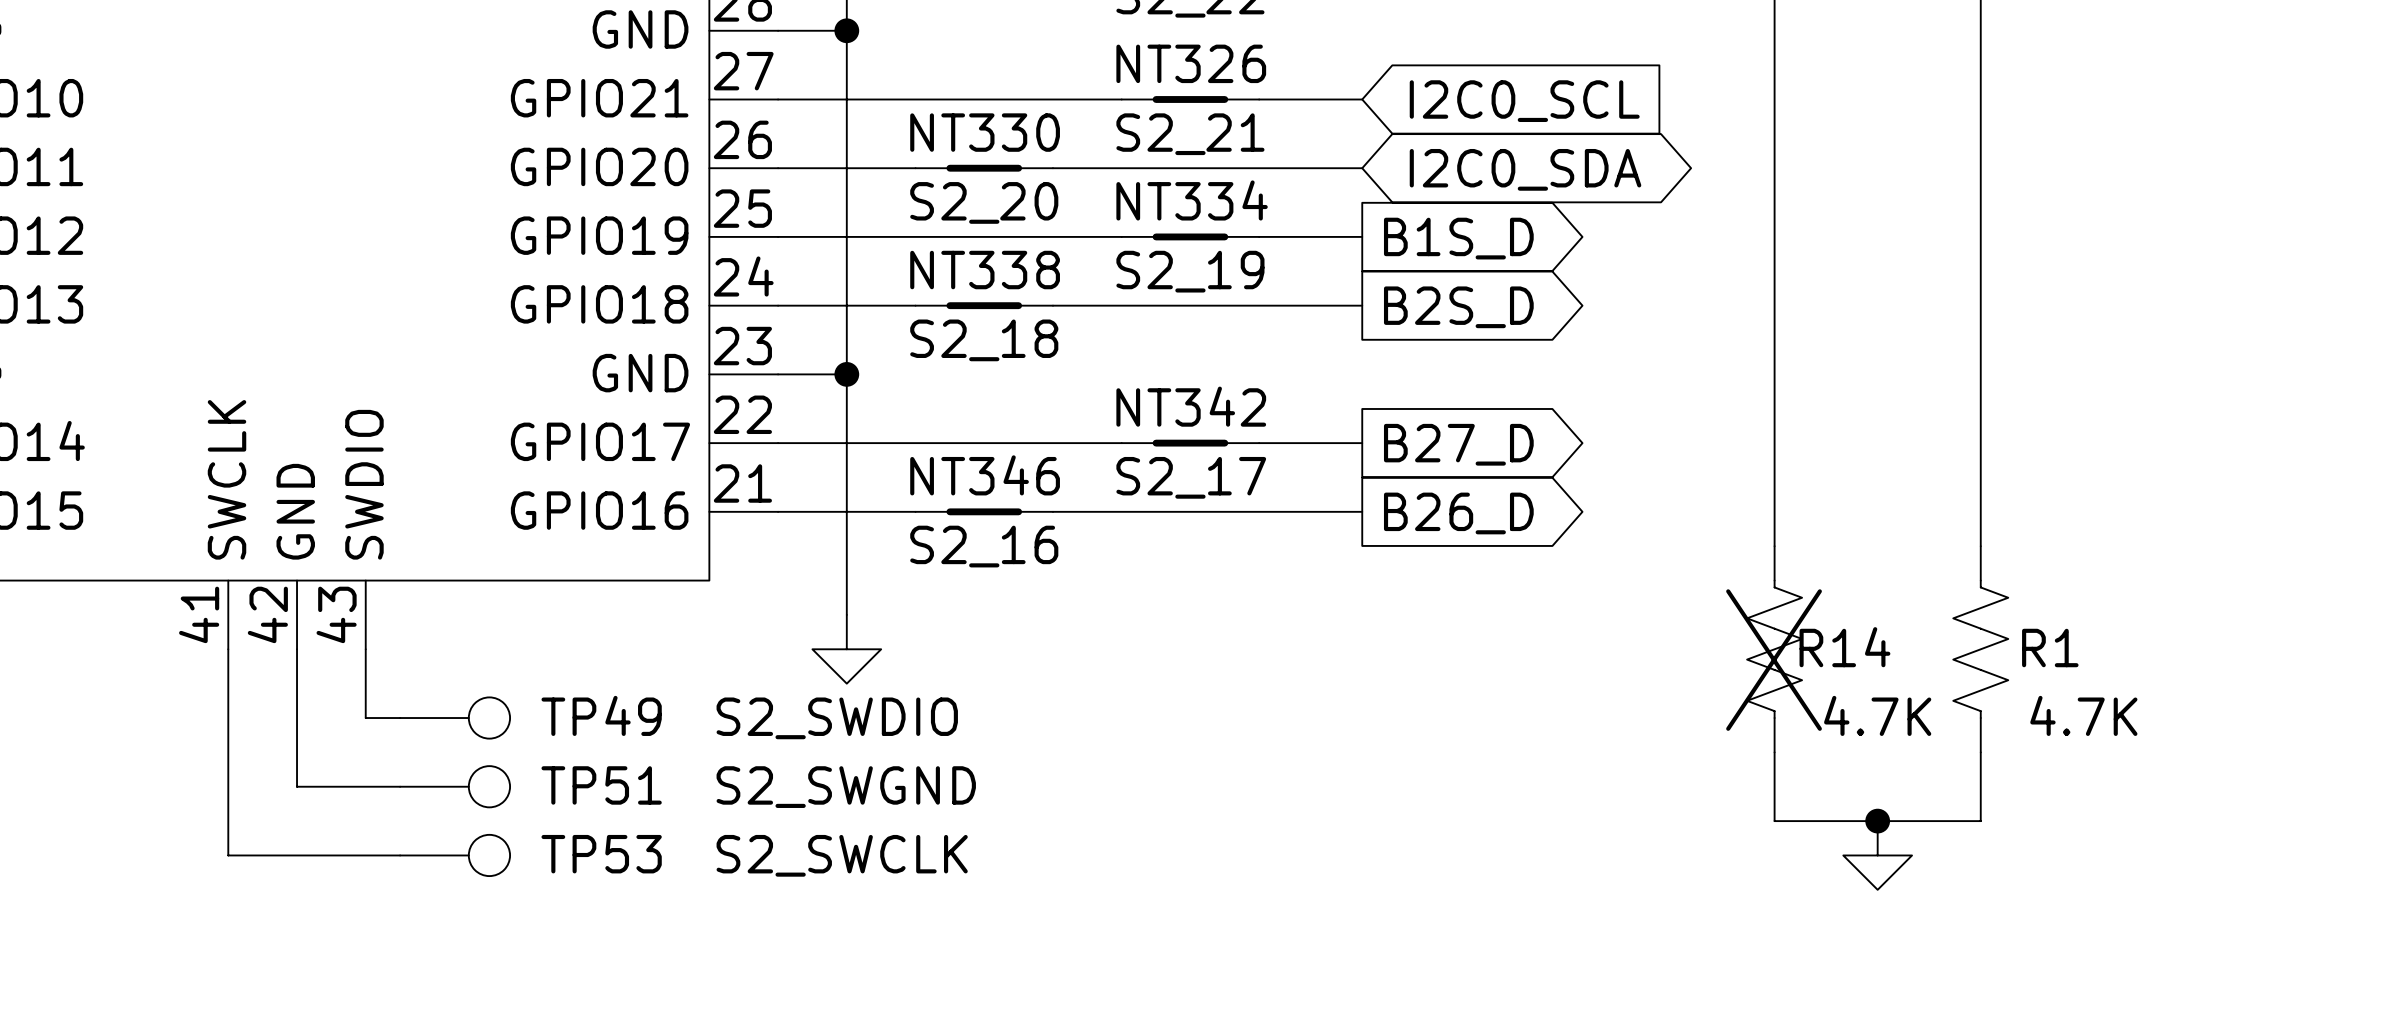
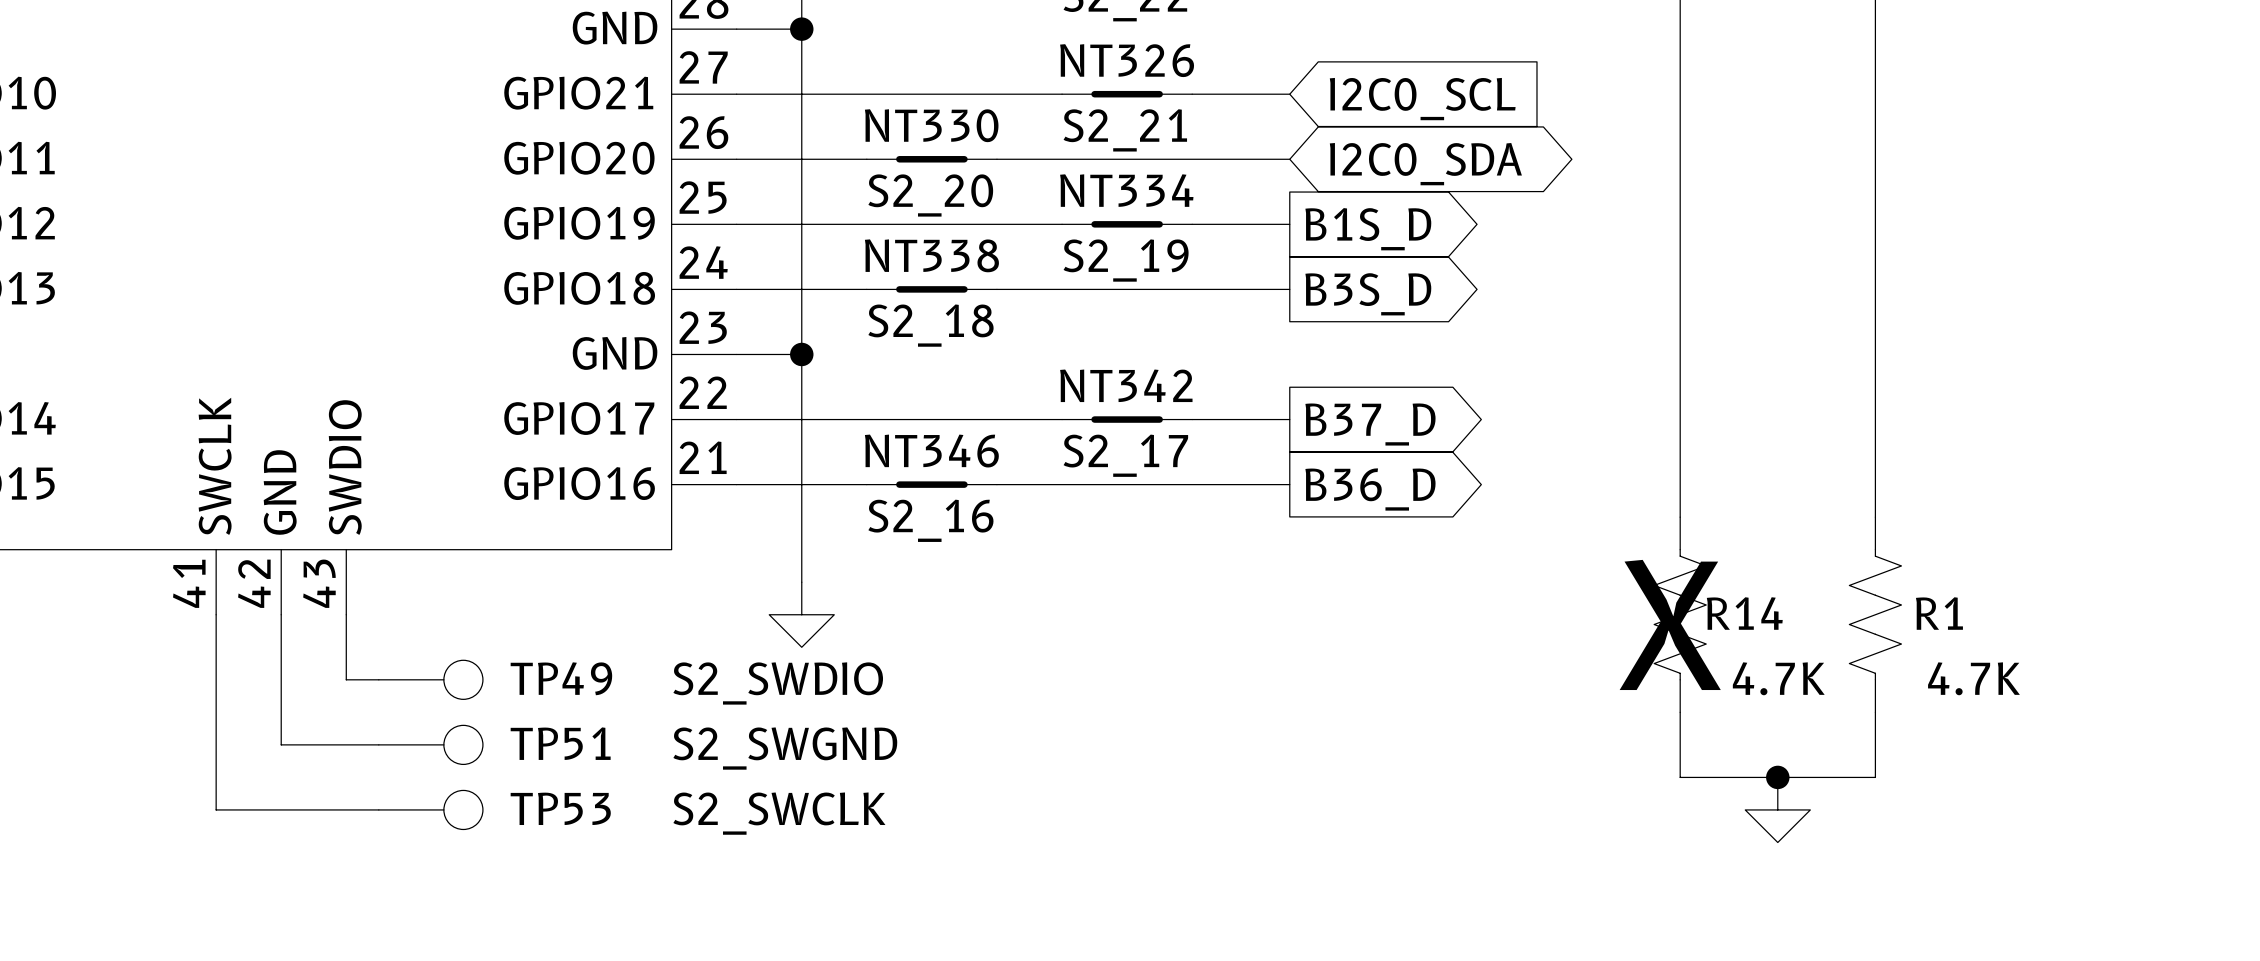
global label: B2S_D (1458, 307) -> B3S_D (1368, 294)
global label: B27_D (1458, 444) -> B37_D (1370, 424)
global label: B26_D (1458, 513) -> B36_D (1370, 489)

